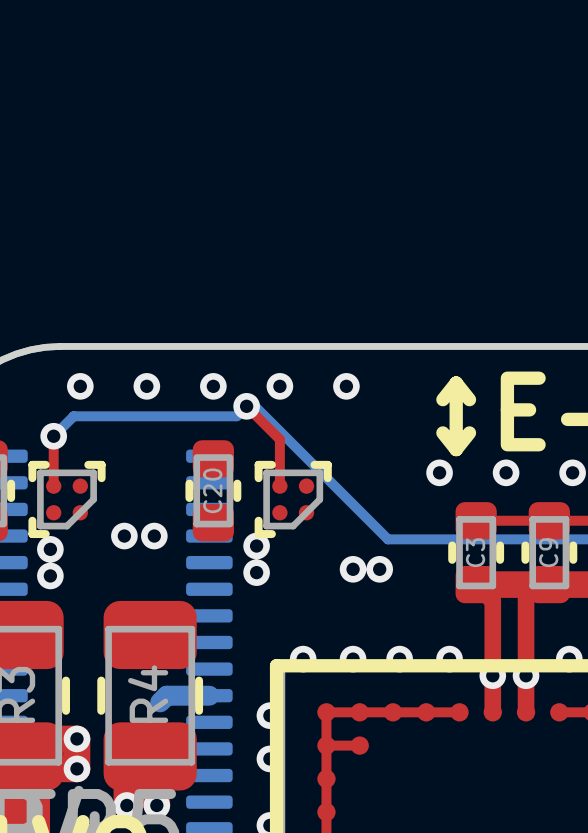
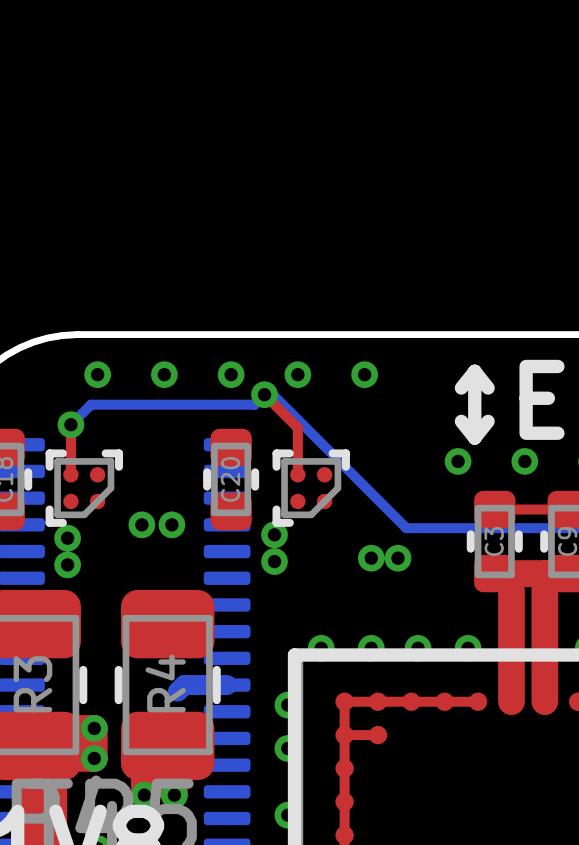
top track width: thin (526, 584) (526, 712) -> thick (544, 573) (544, 701)
top track width: thin (492, 601) (492, 712) -> thick (511, 590) (511, 701)
via: (492, 675) -> none
via: (526, 675) -> none

